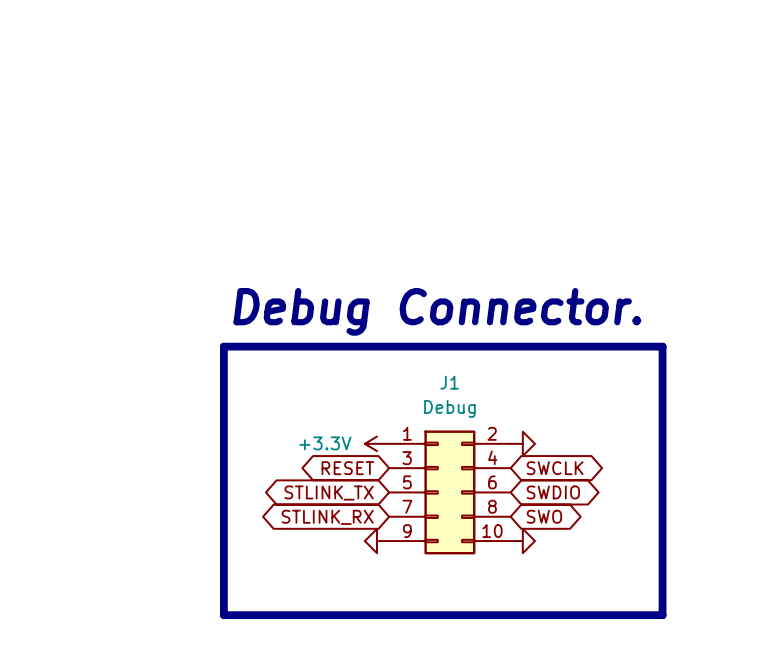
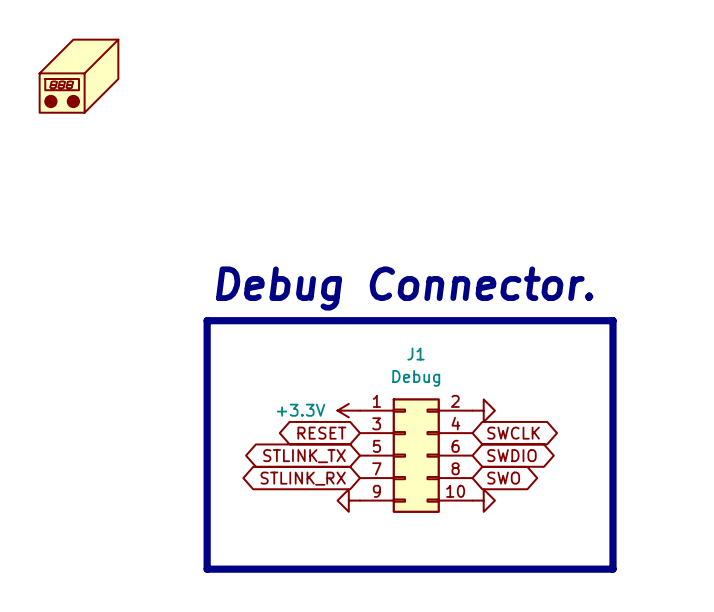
part: none -> (78, 76)

